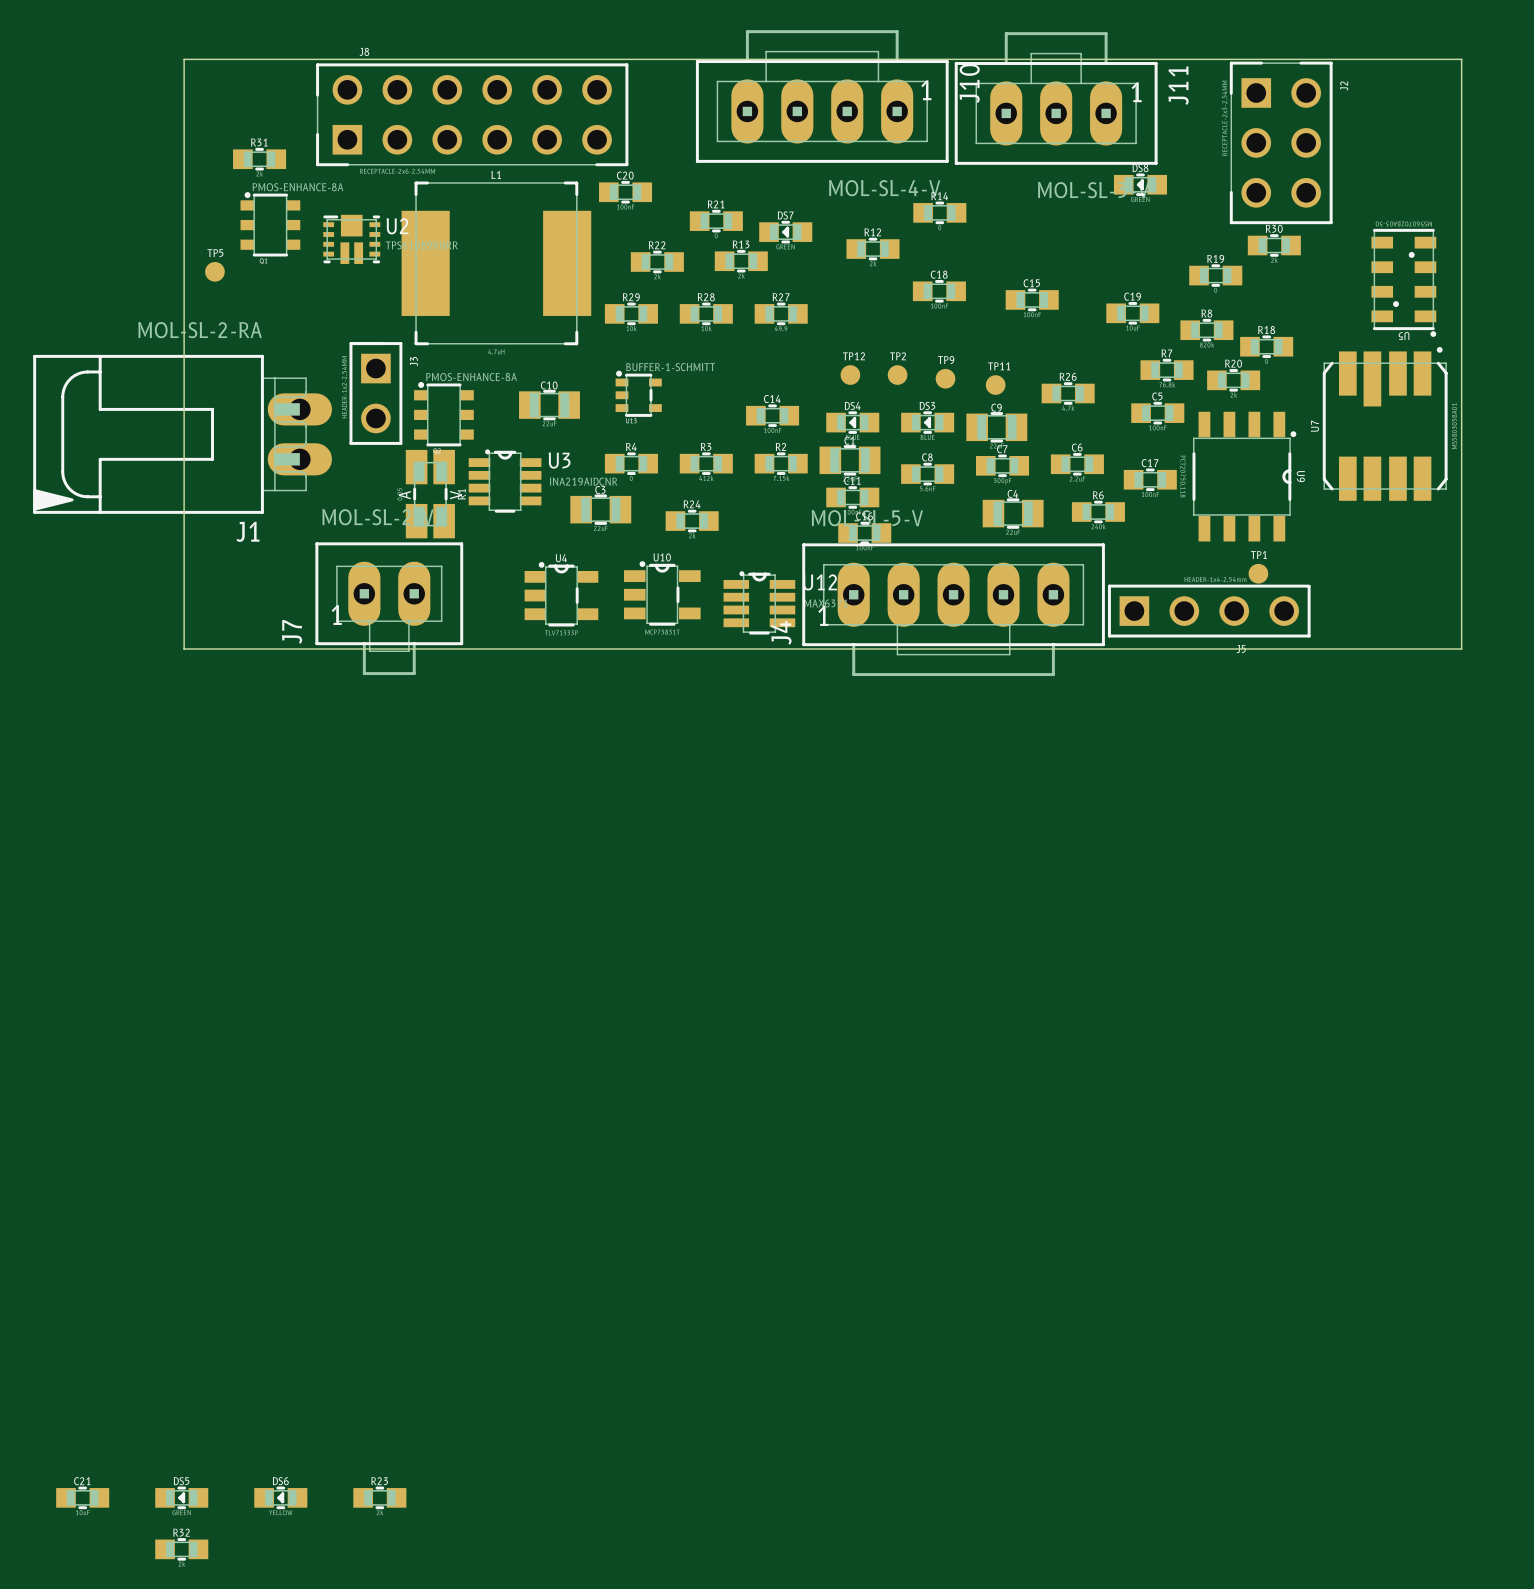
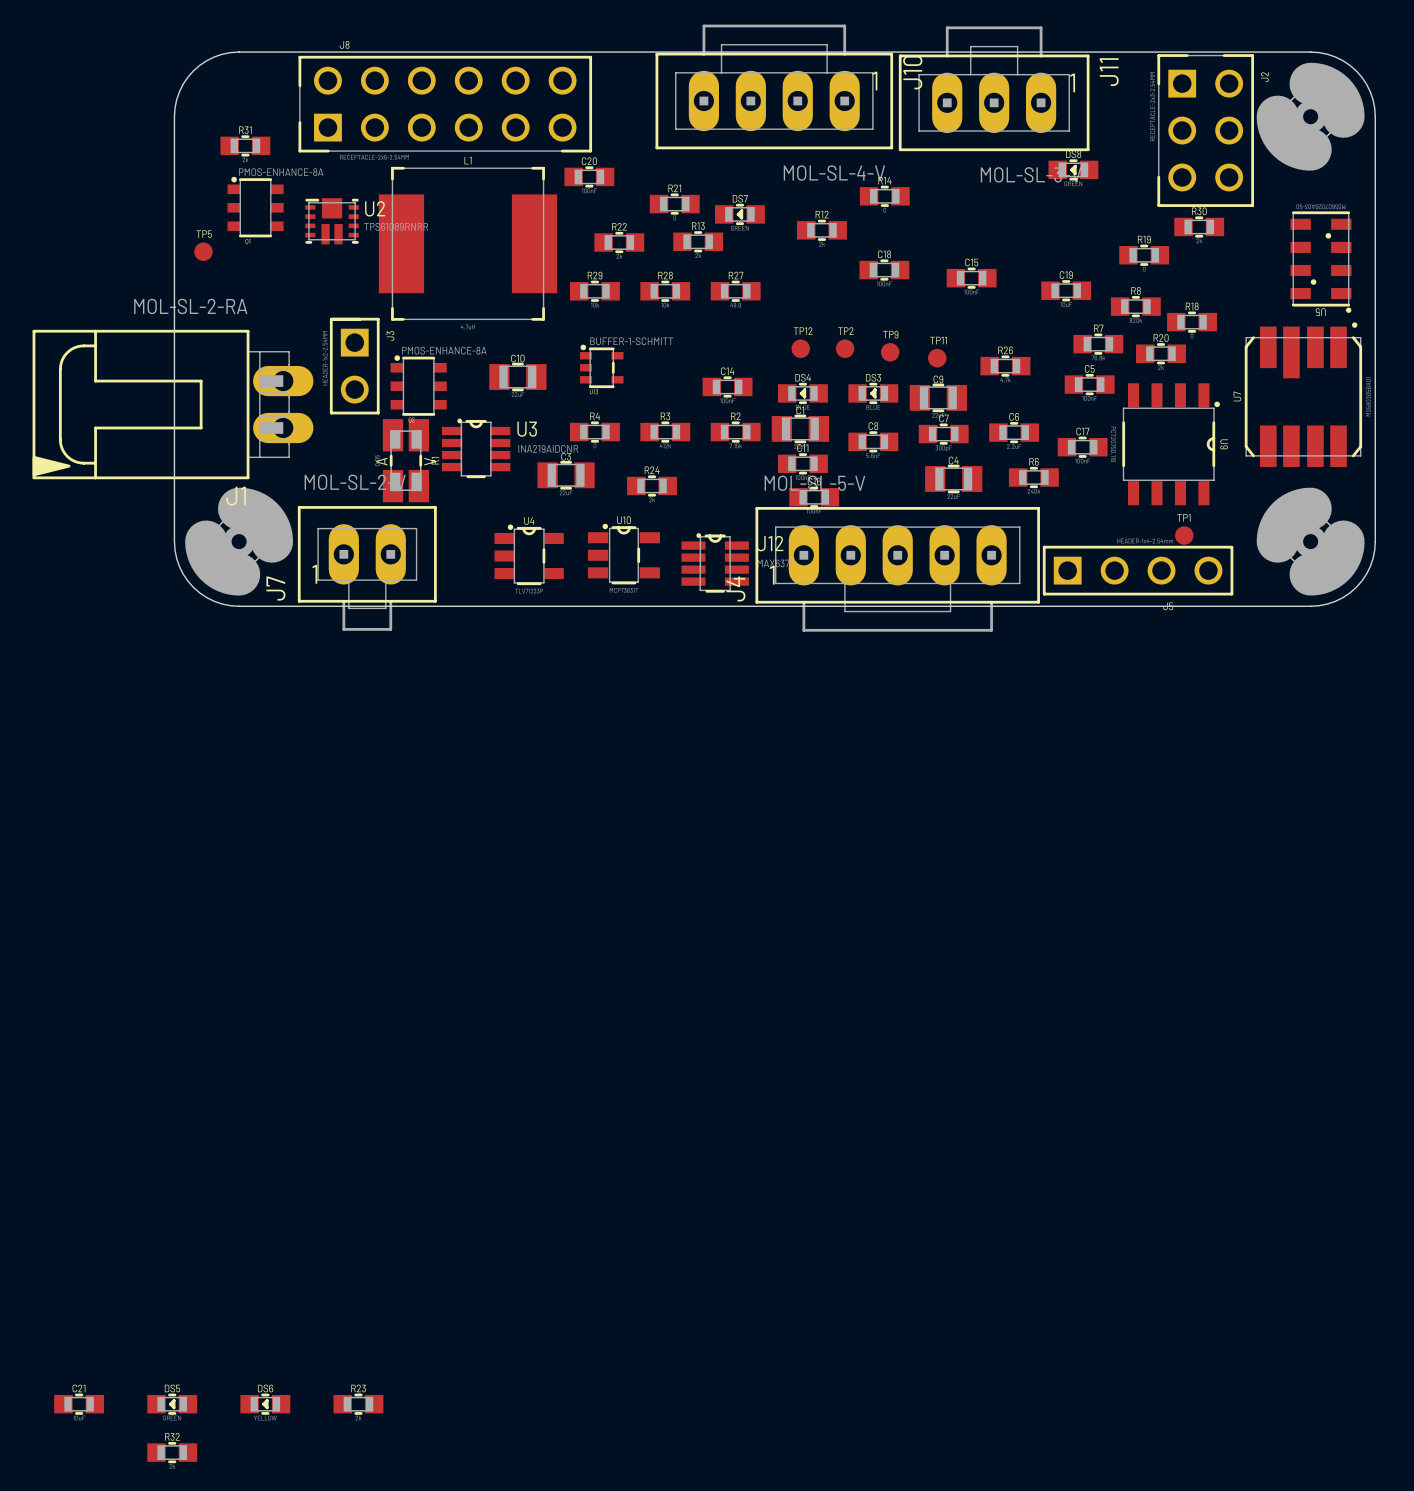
board edge: (184, 59) (1461, 59) (1461, 649) (184, 649) (184, 59) -> none
part: none -> (774, 329)

